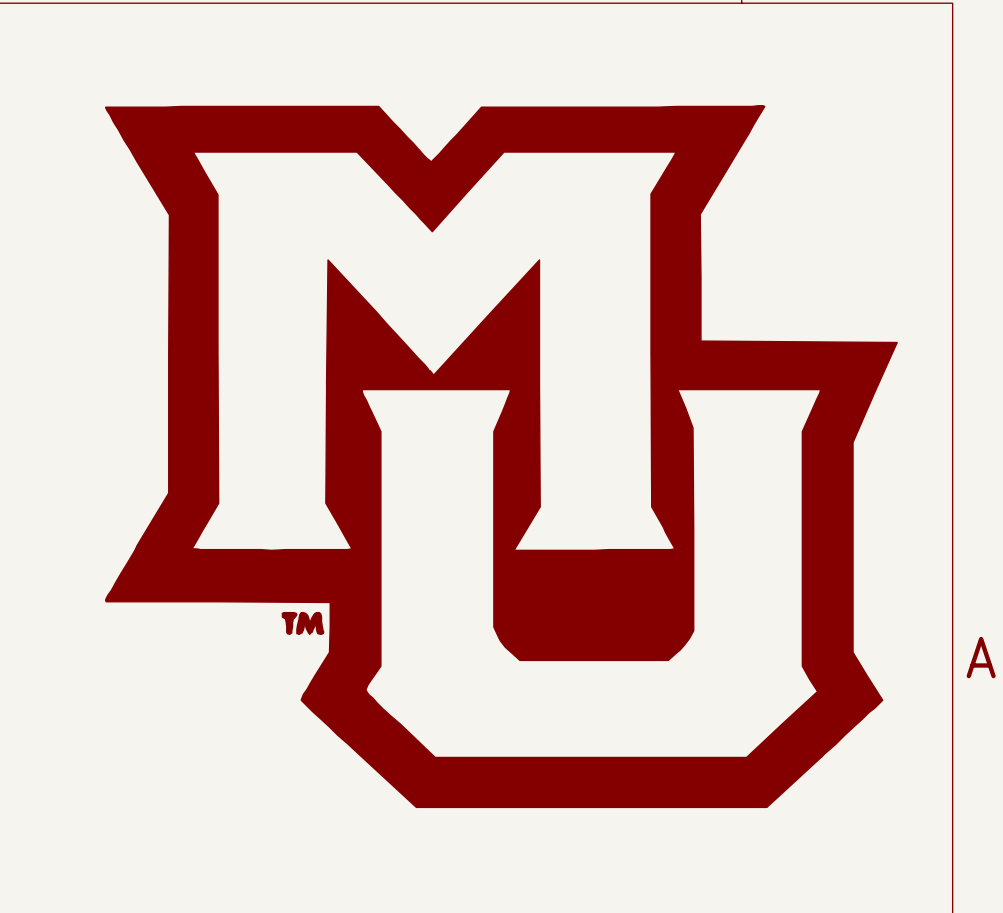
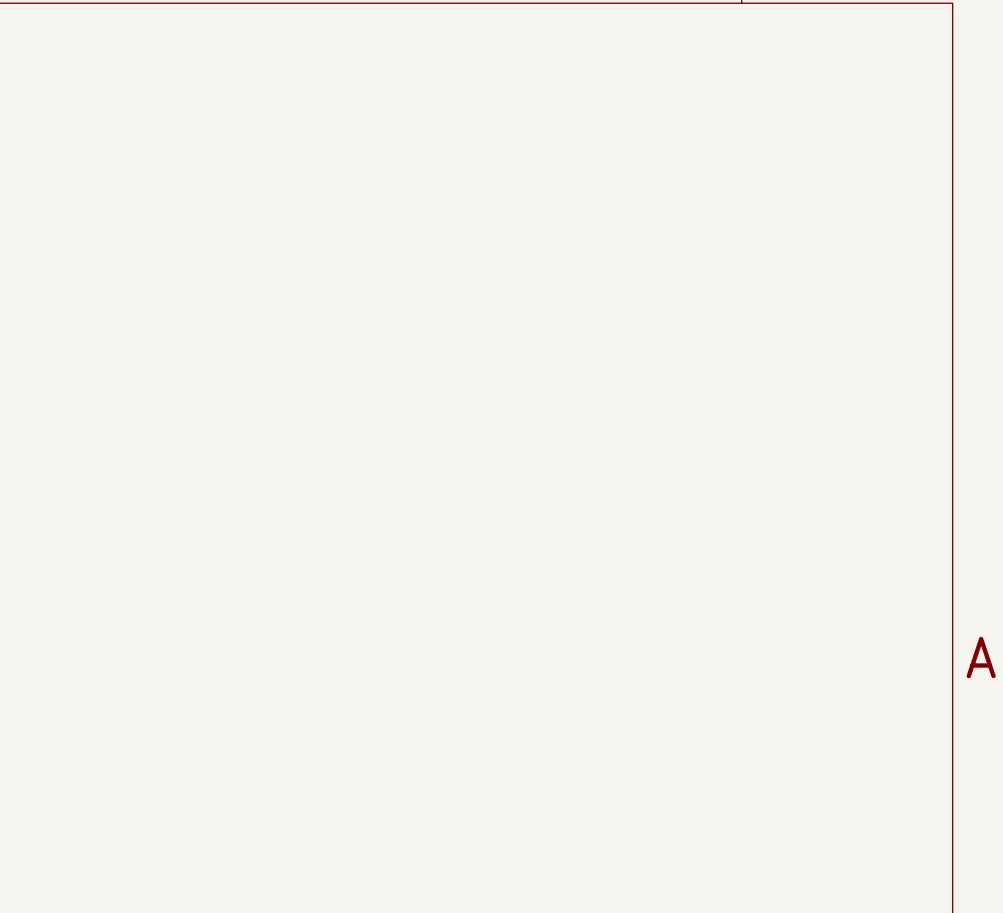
power symbol: (501, 456) -> none

